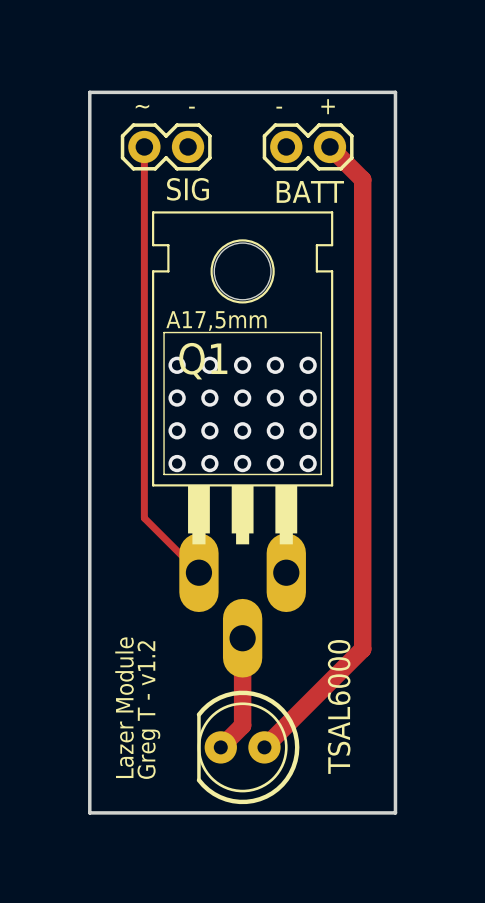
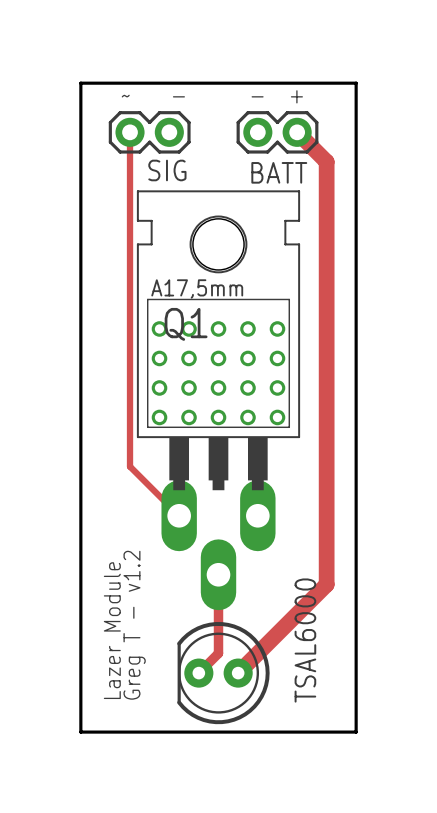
track width: thick (242, 638) (242, 725) (220, 747) -> thin (218, 574) (218, 653) (198, 673)

